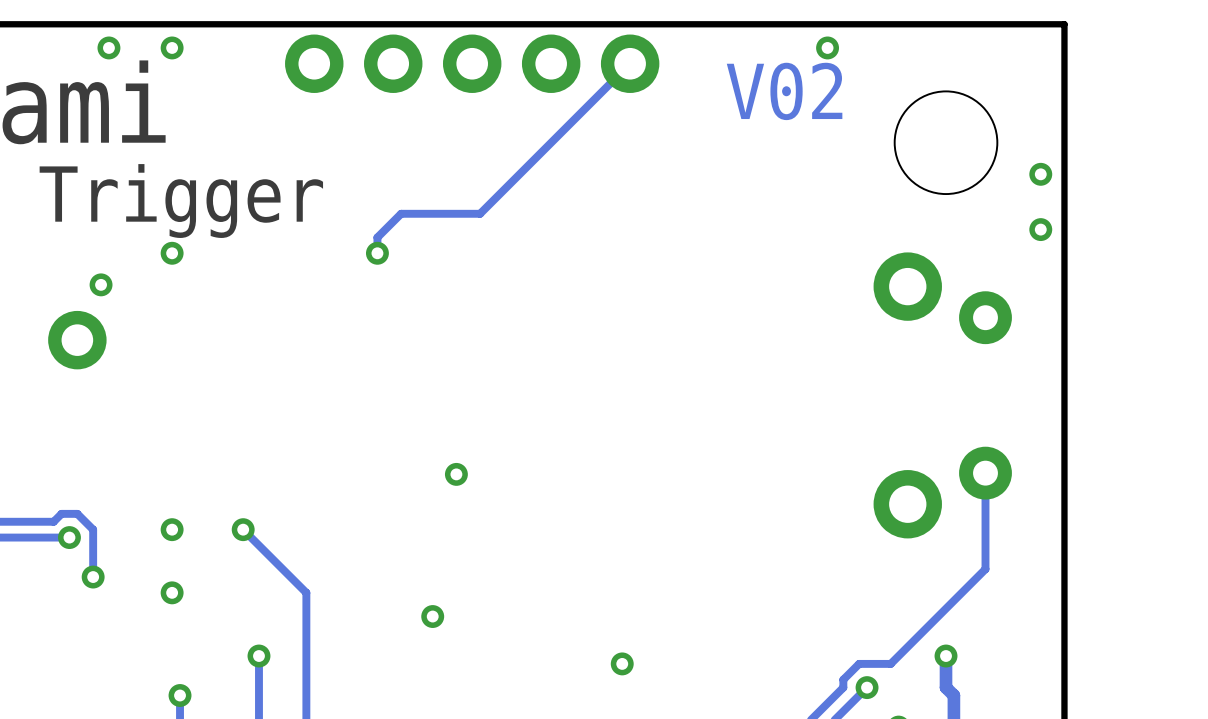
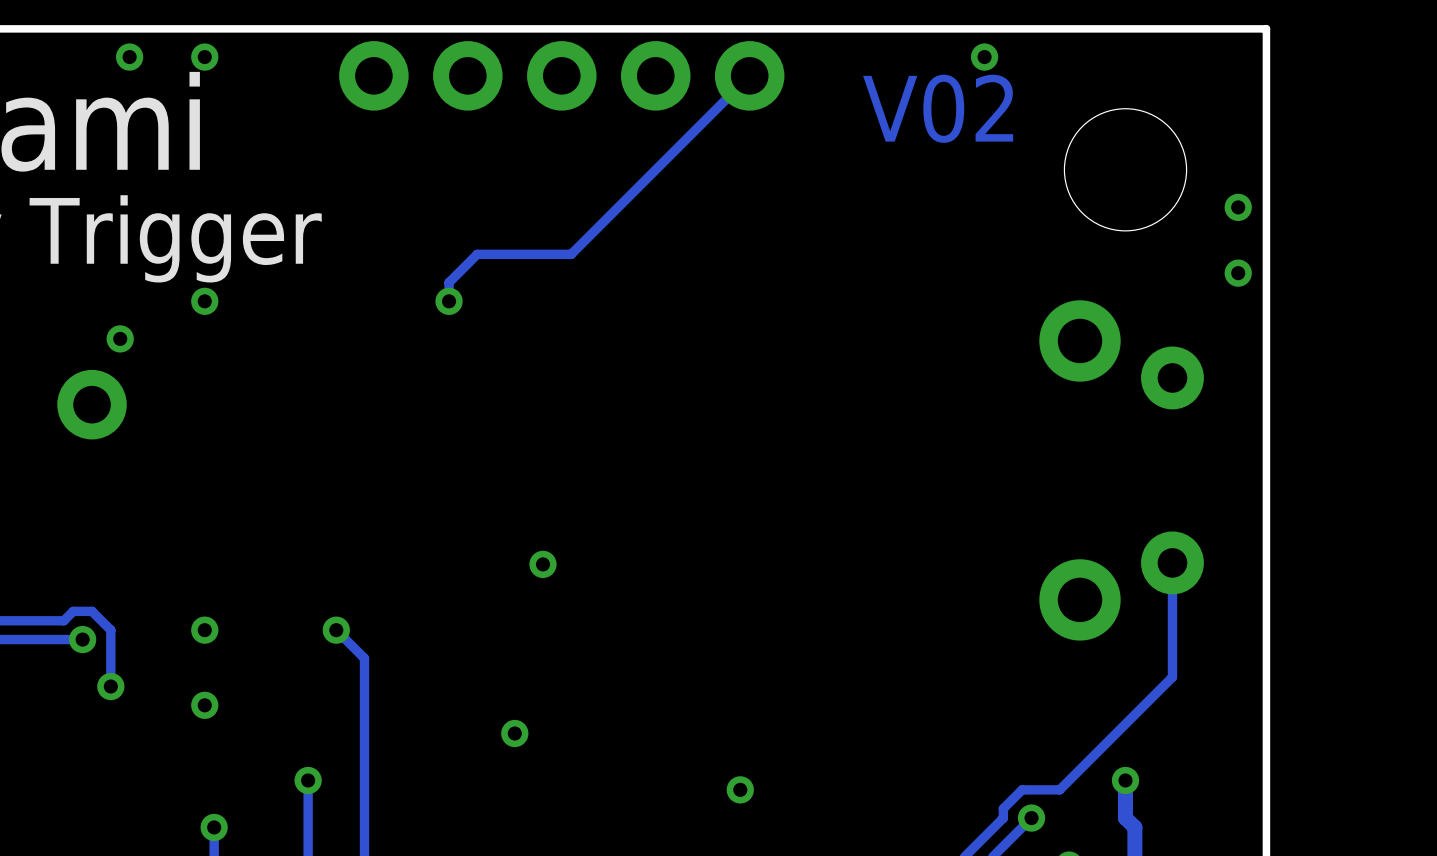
track: (243, 529) (306, 592) -> (336, 630) (364, 658) (364, 705)
via position: (243, 529) -> (336, 630)

